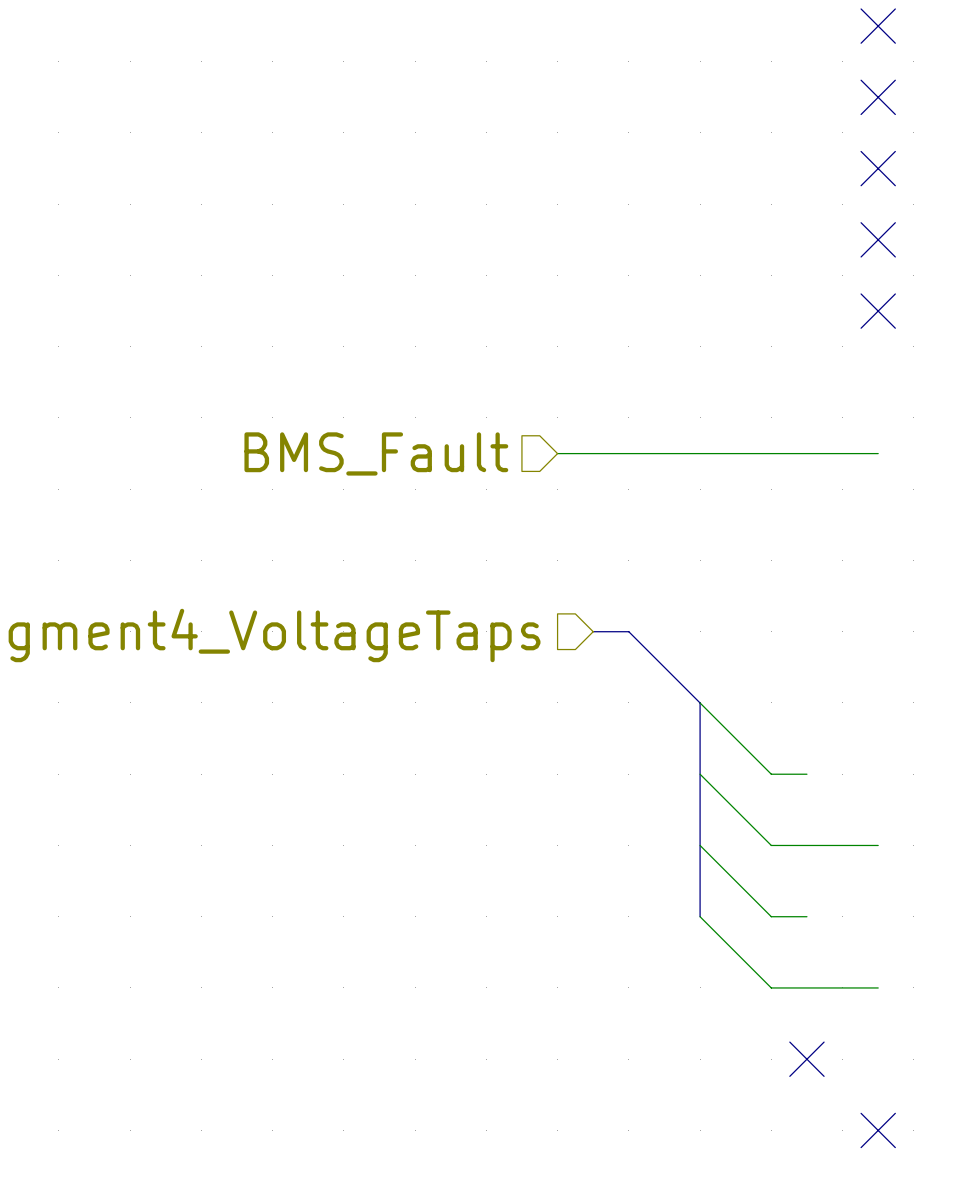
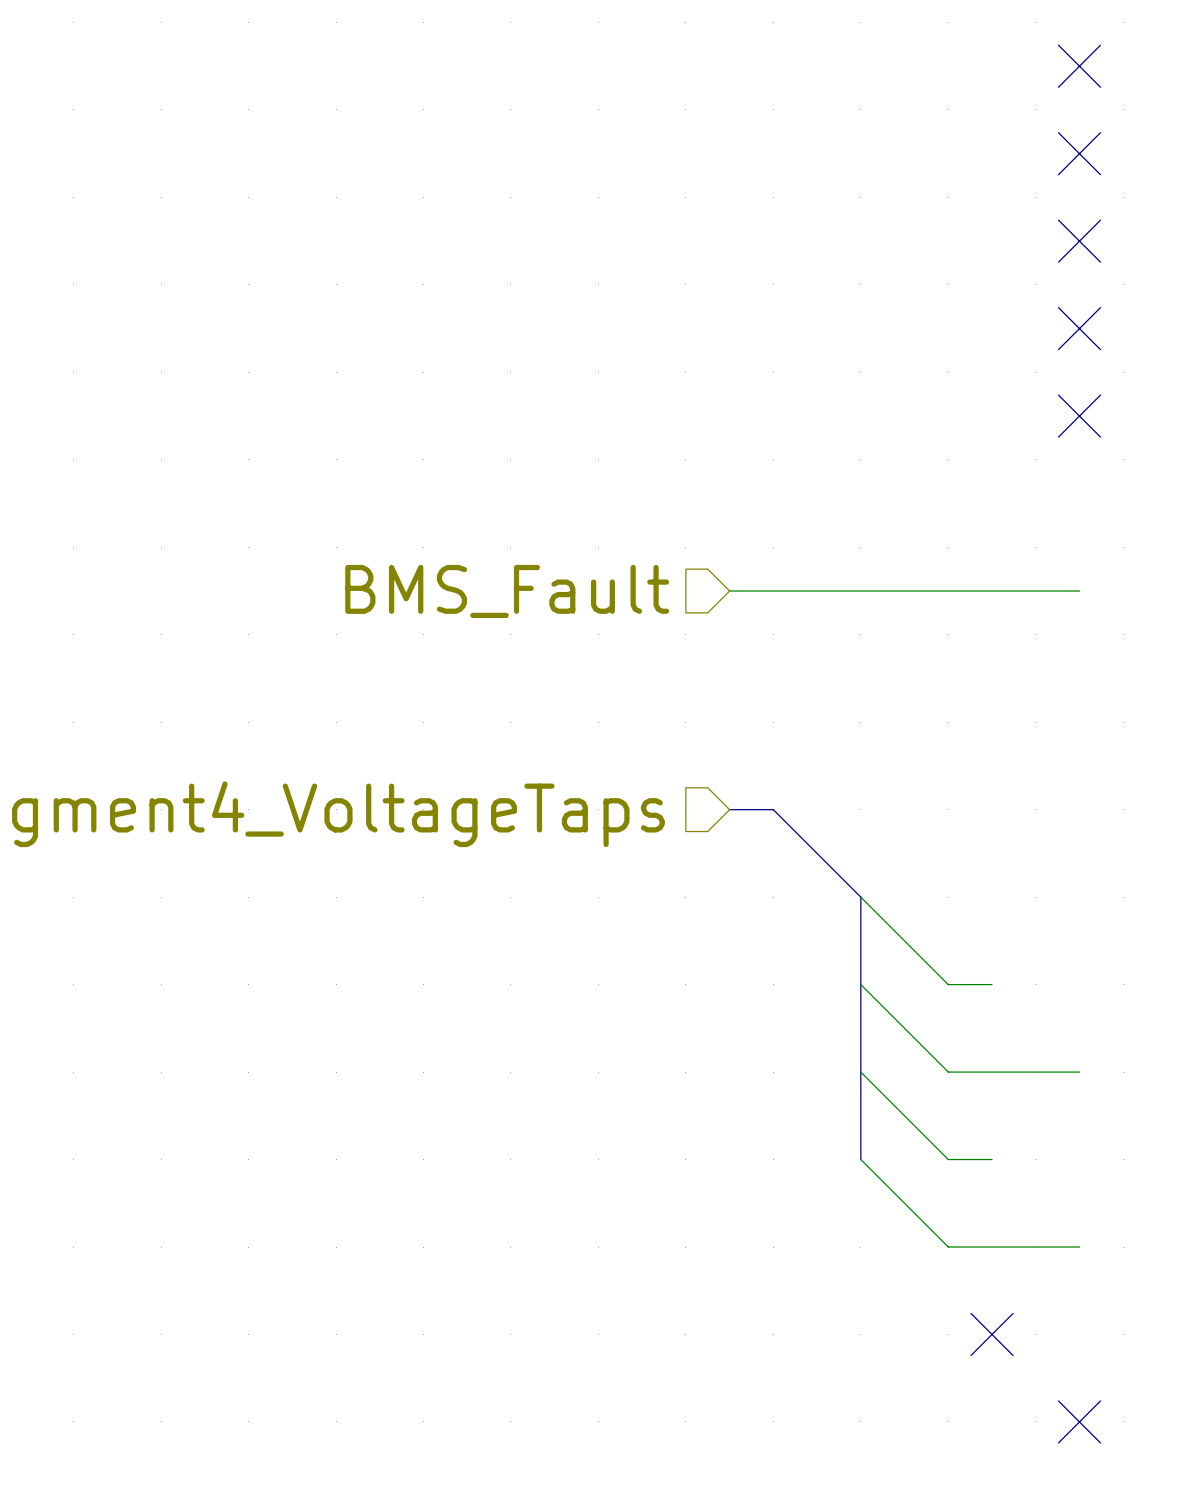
hierarchical label position: BMS_Fault (376, 453) -> BMS_Fault (507, 591)
wire: (557, 453) (593, 453) -> none

